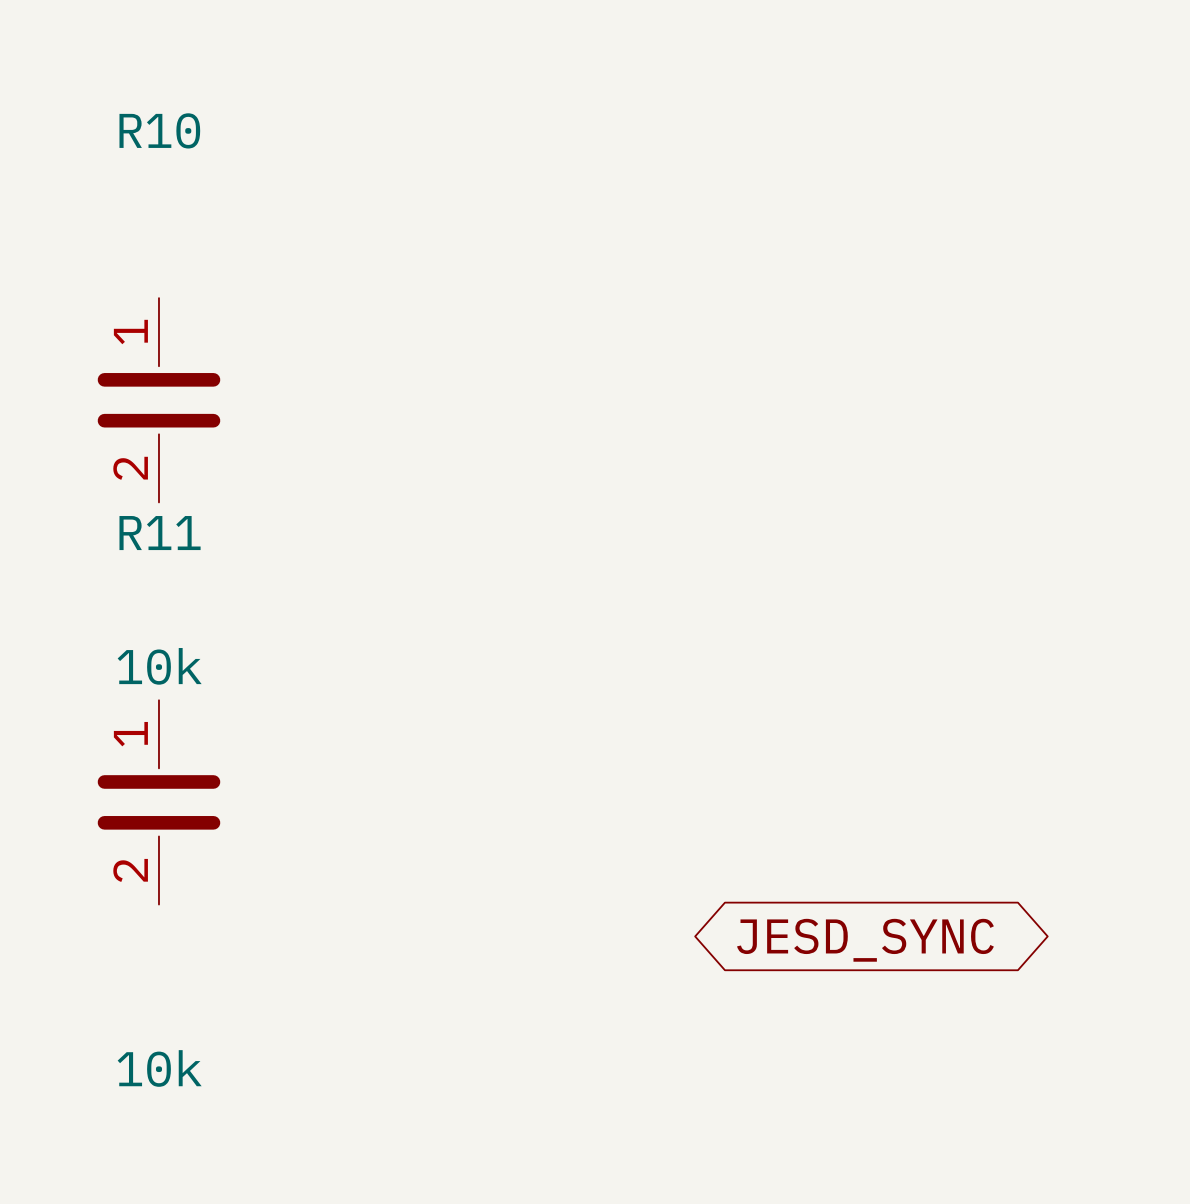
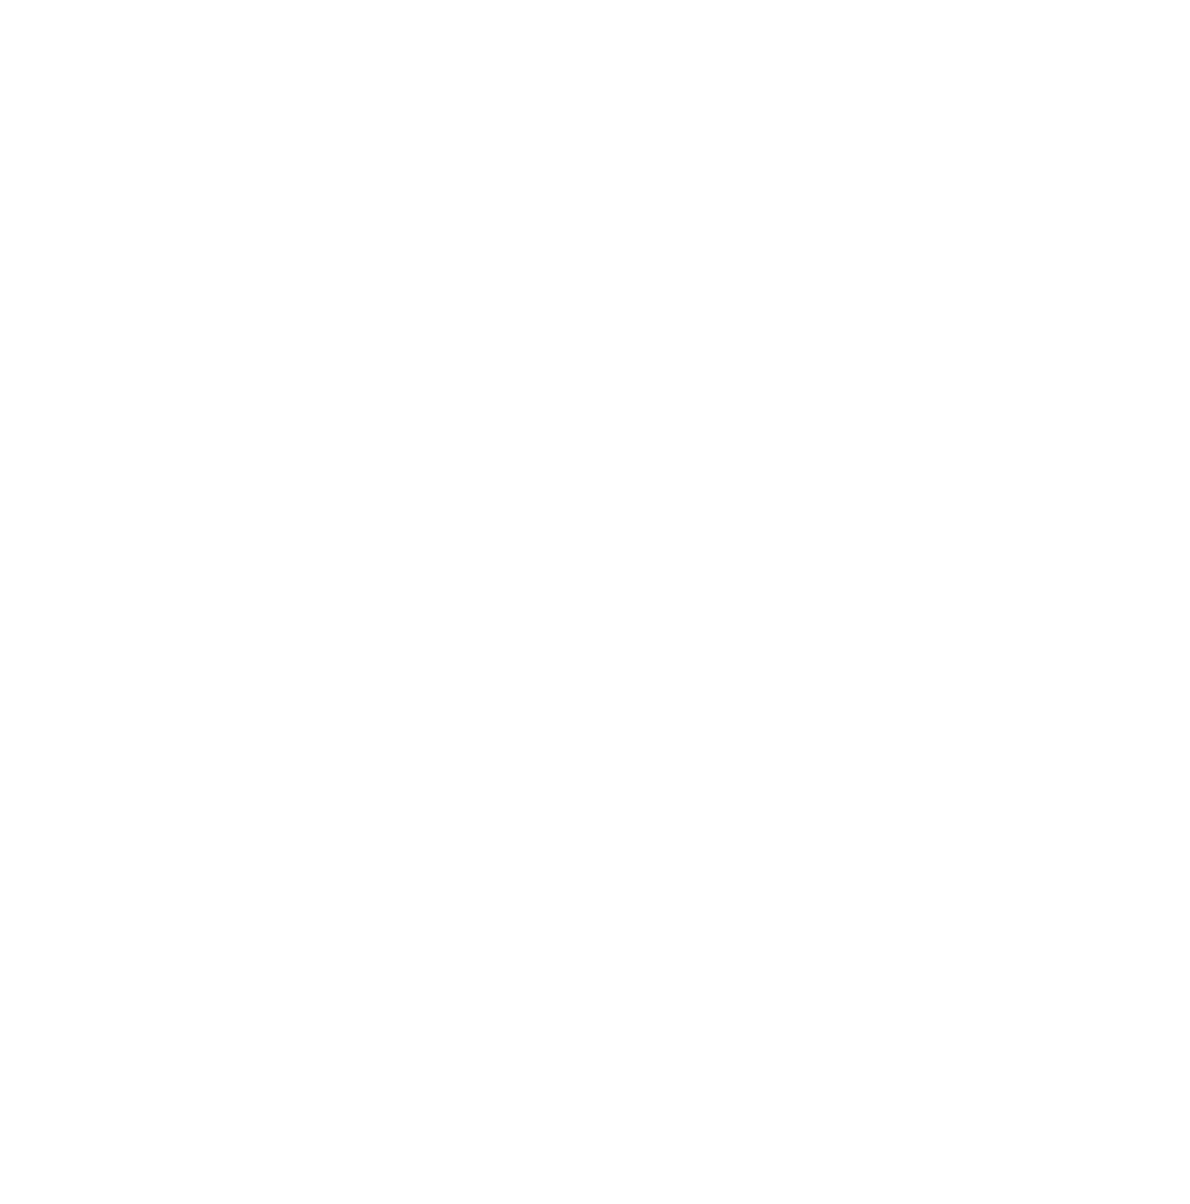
R10: 10k (158, 400) -> none
R11: 10k (158, 802) -> none
global label: JESD_SYNC (865, 940) -> none

